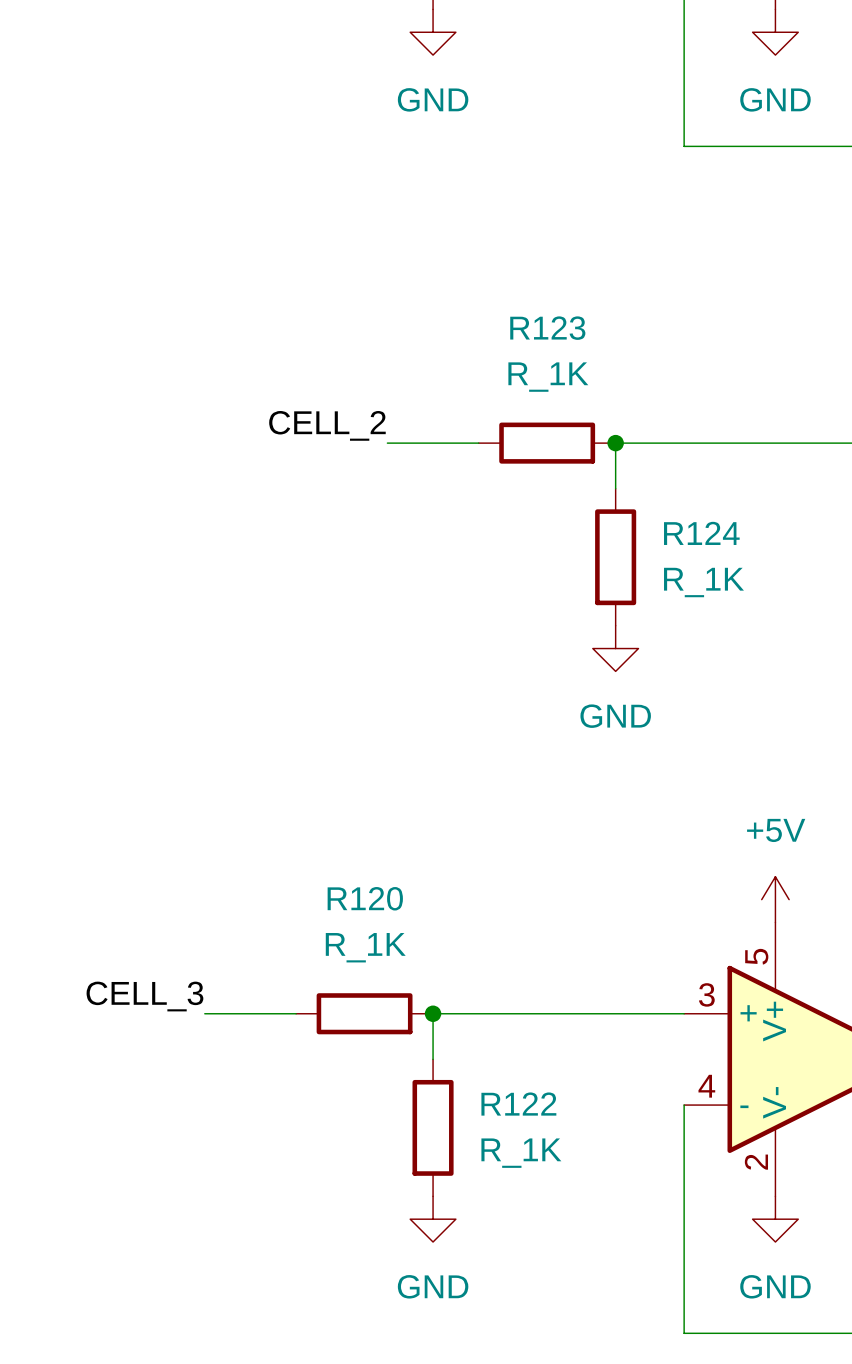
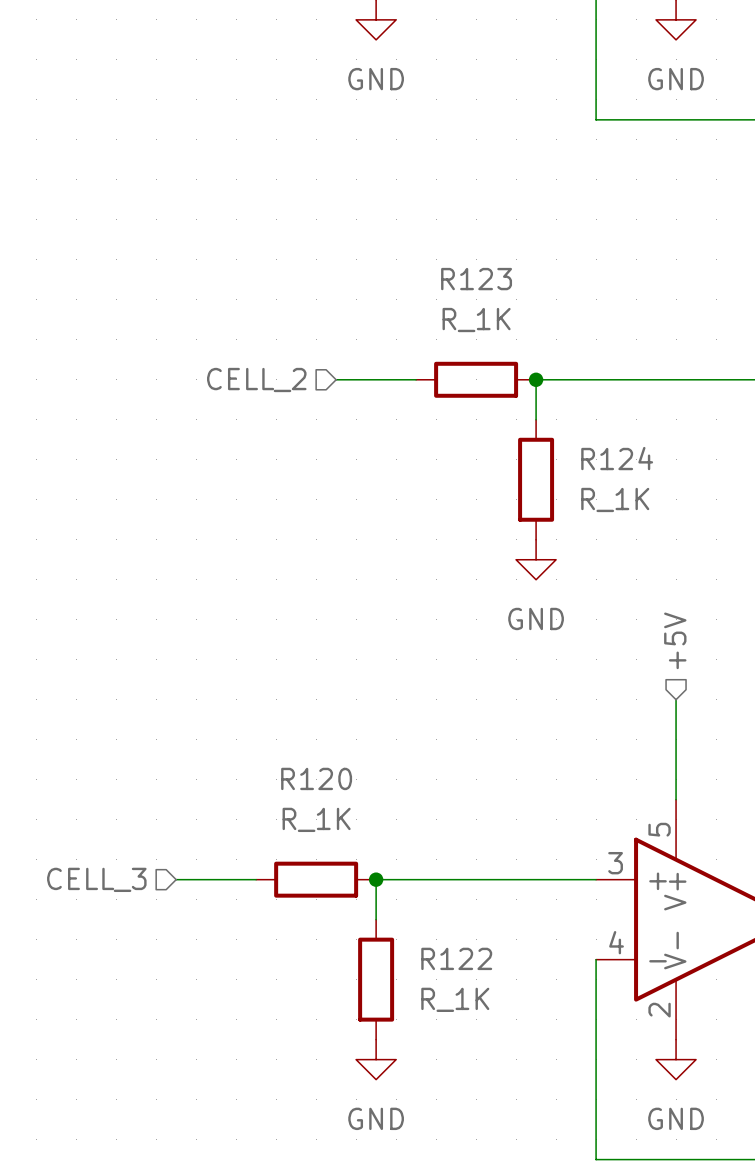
label: CELL_2 (327, 425) -> none
hierarchical label: none -> CELL_2 (256, 379)
hierarchical label: none -> +5V (675, 640)
wire: none -> (676, 699) (676, 799)
power symbol: +5V (775, 899) -> none
label: CELL_3 (144, 996) -> none
hierarchical label: none -> CELL_3 (96, 879)

